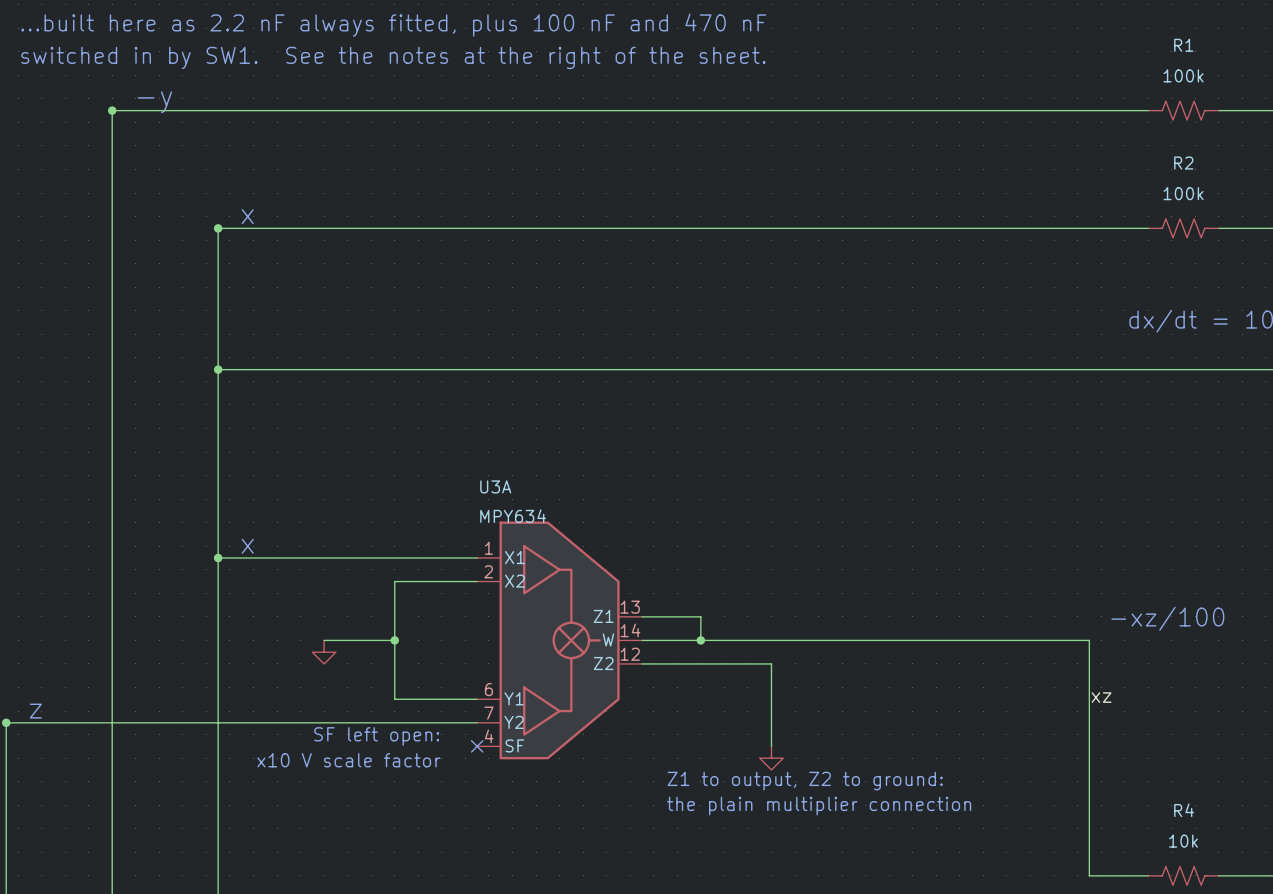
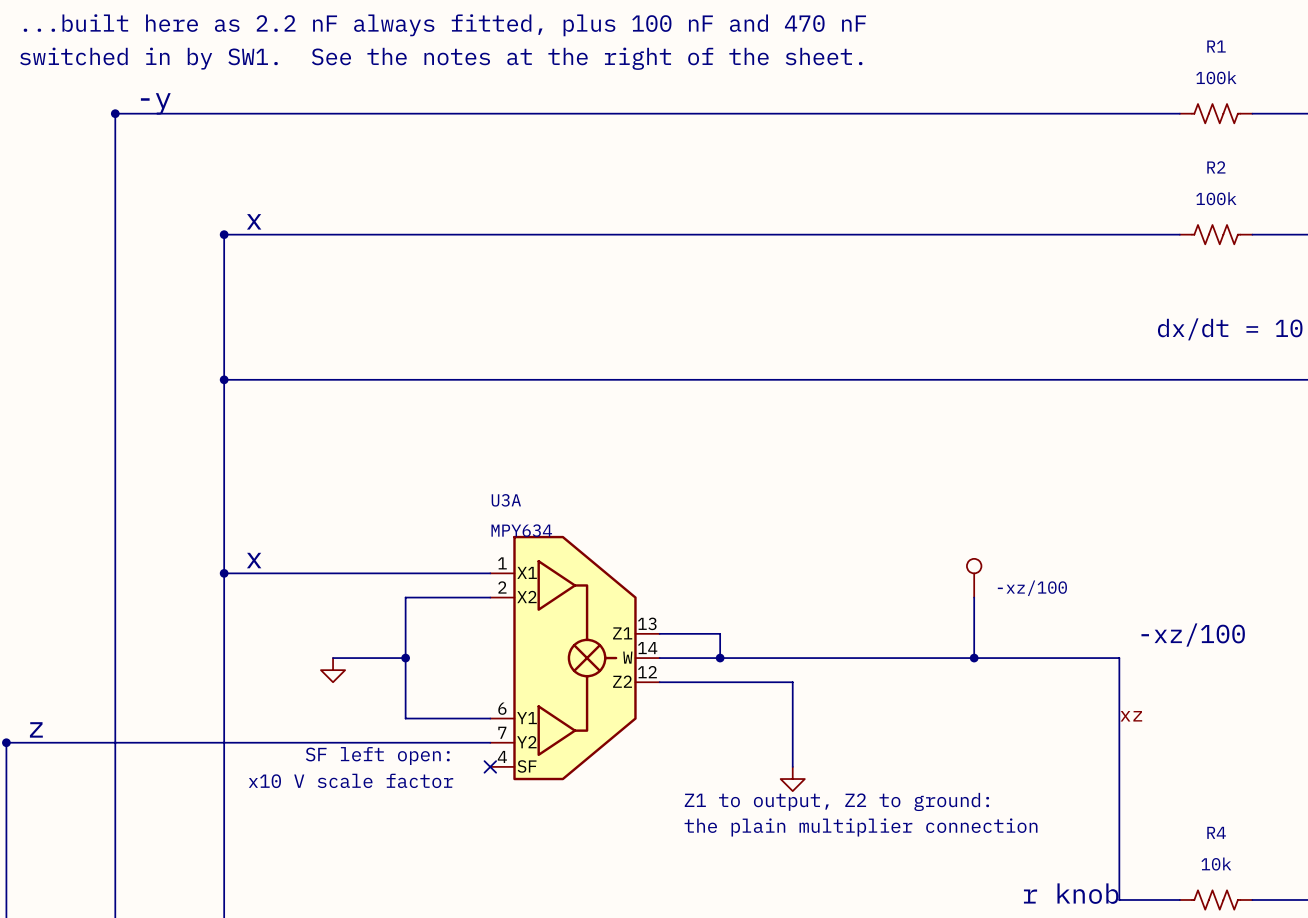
part: none -> -xz/100 (974, 578)
wire: none -> (974, 597) (974, 658)
junction: none -> (974, 658)
text: none -> r knob (1071, 893)

